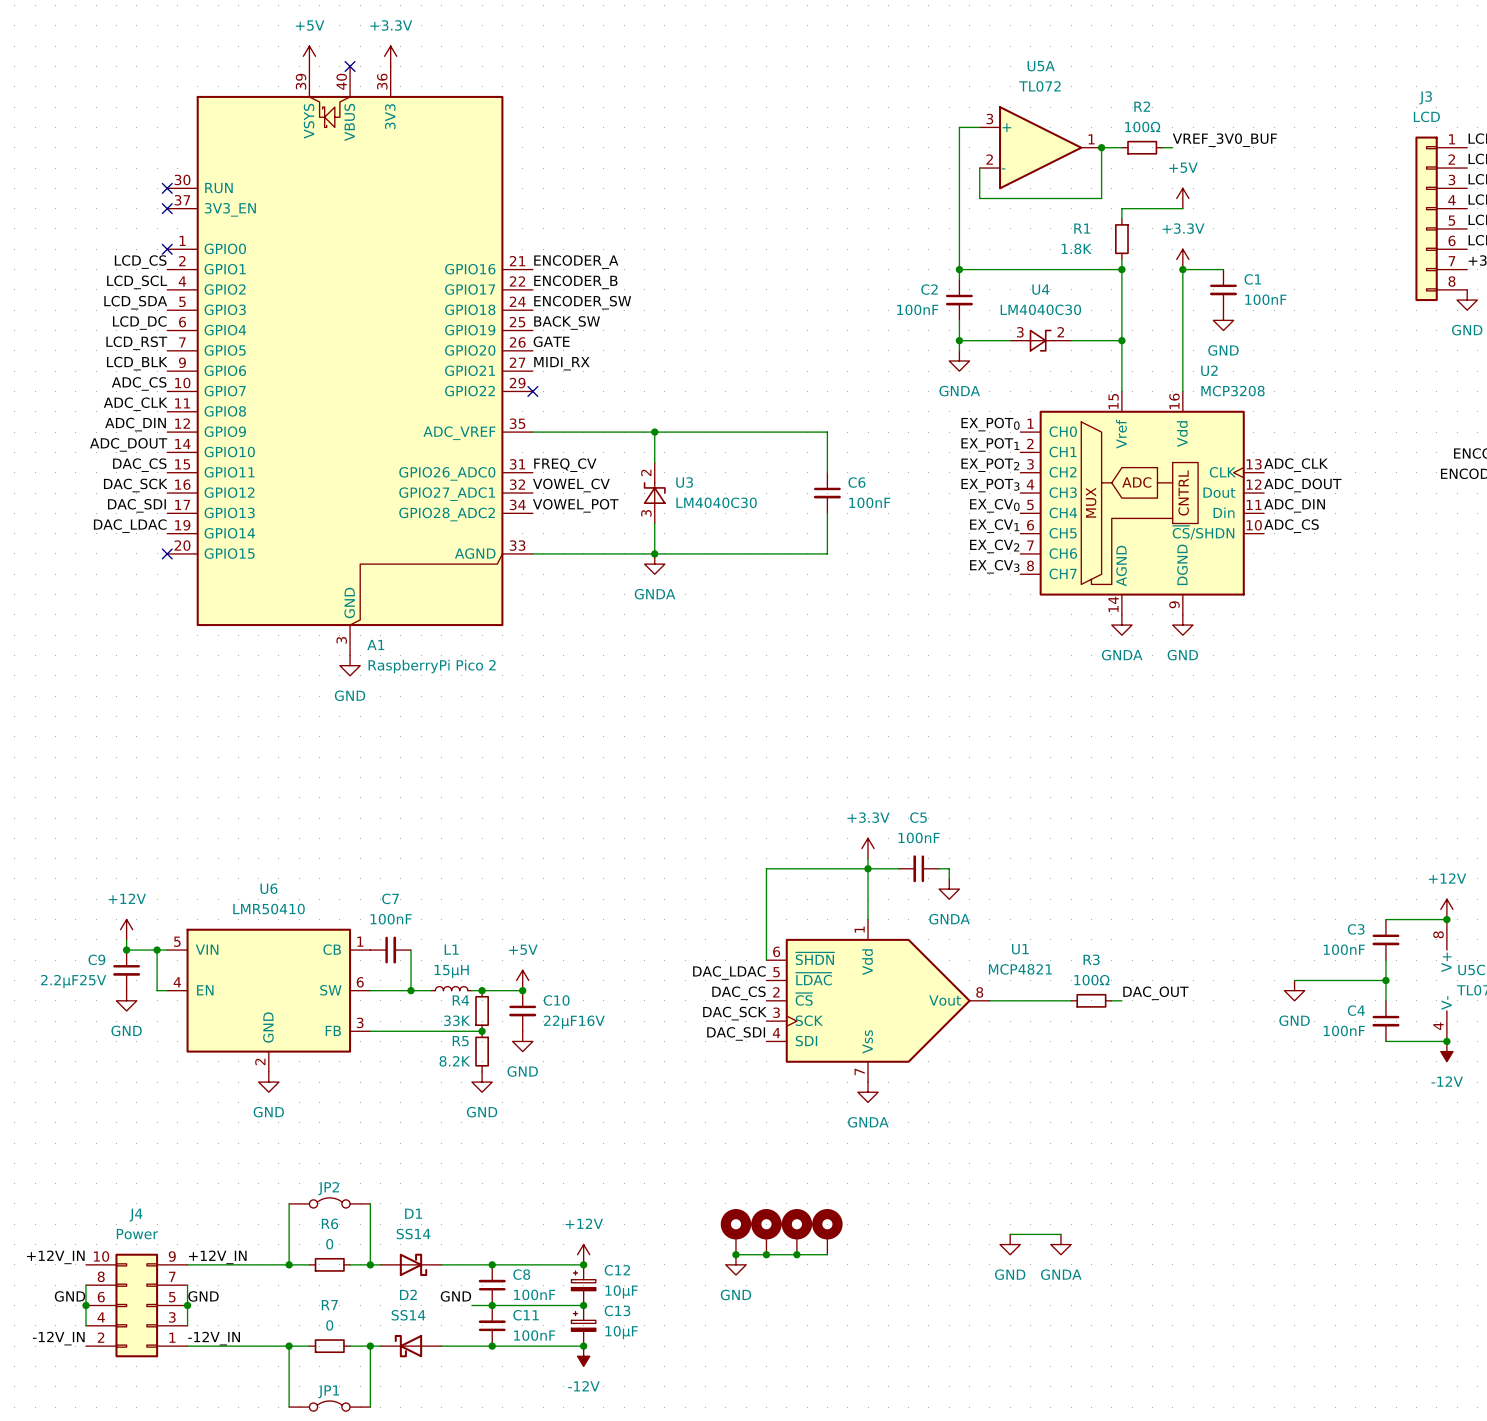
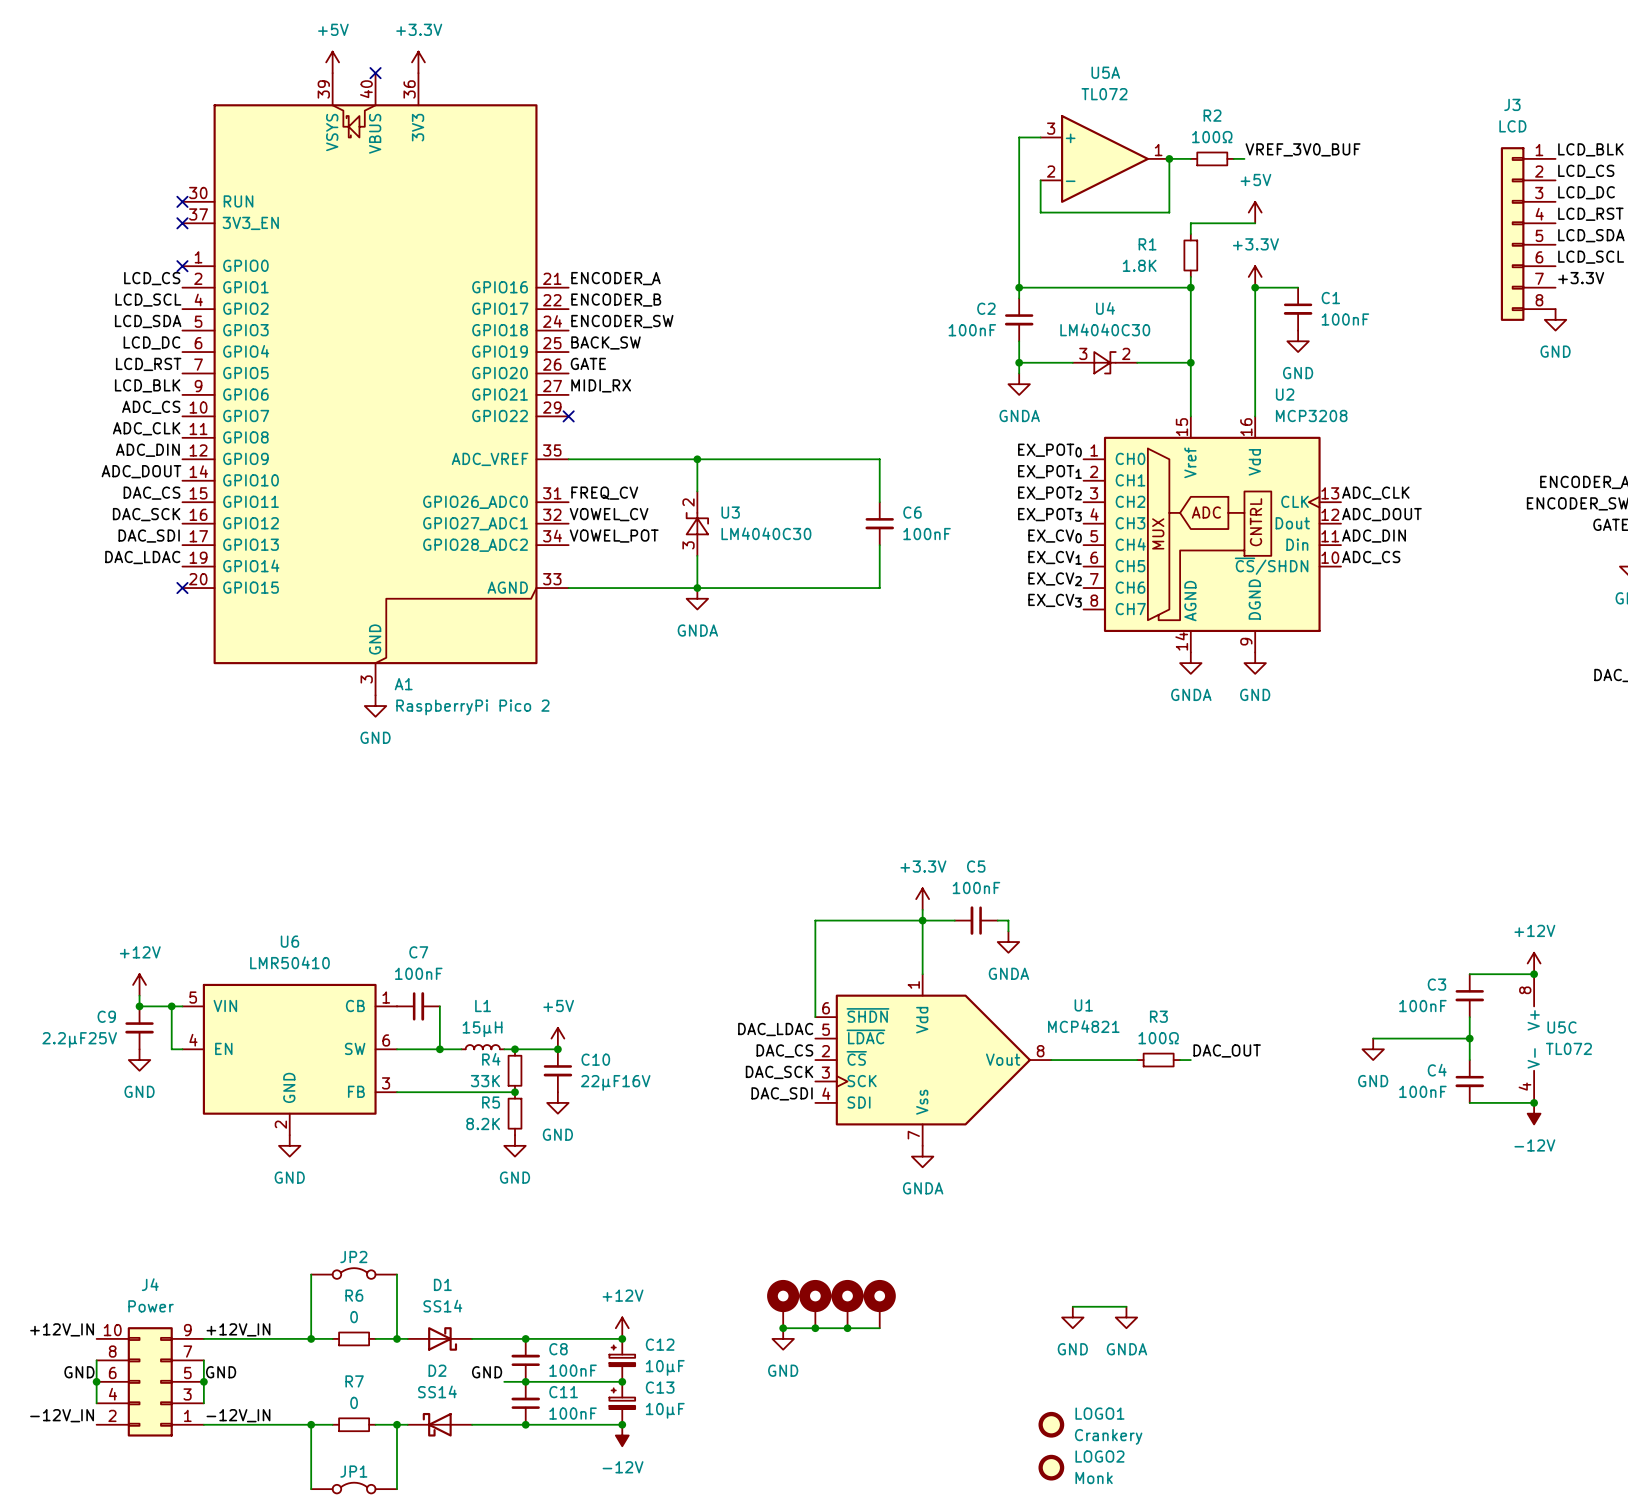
LOGO1: none -> Crankery (1051, 1424)
LOGO2: none -> Monk (1051, 1467)

